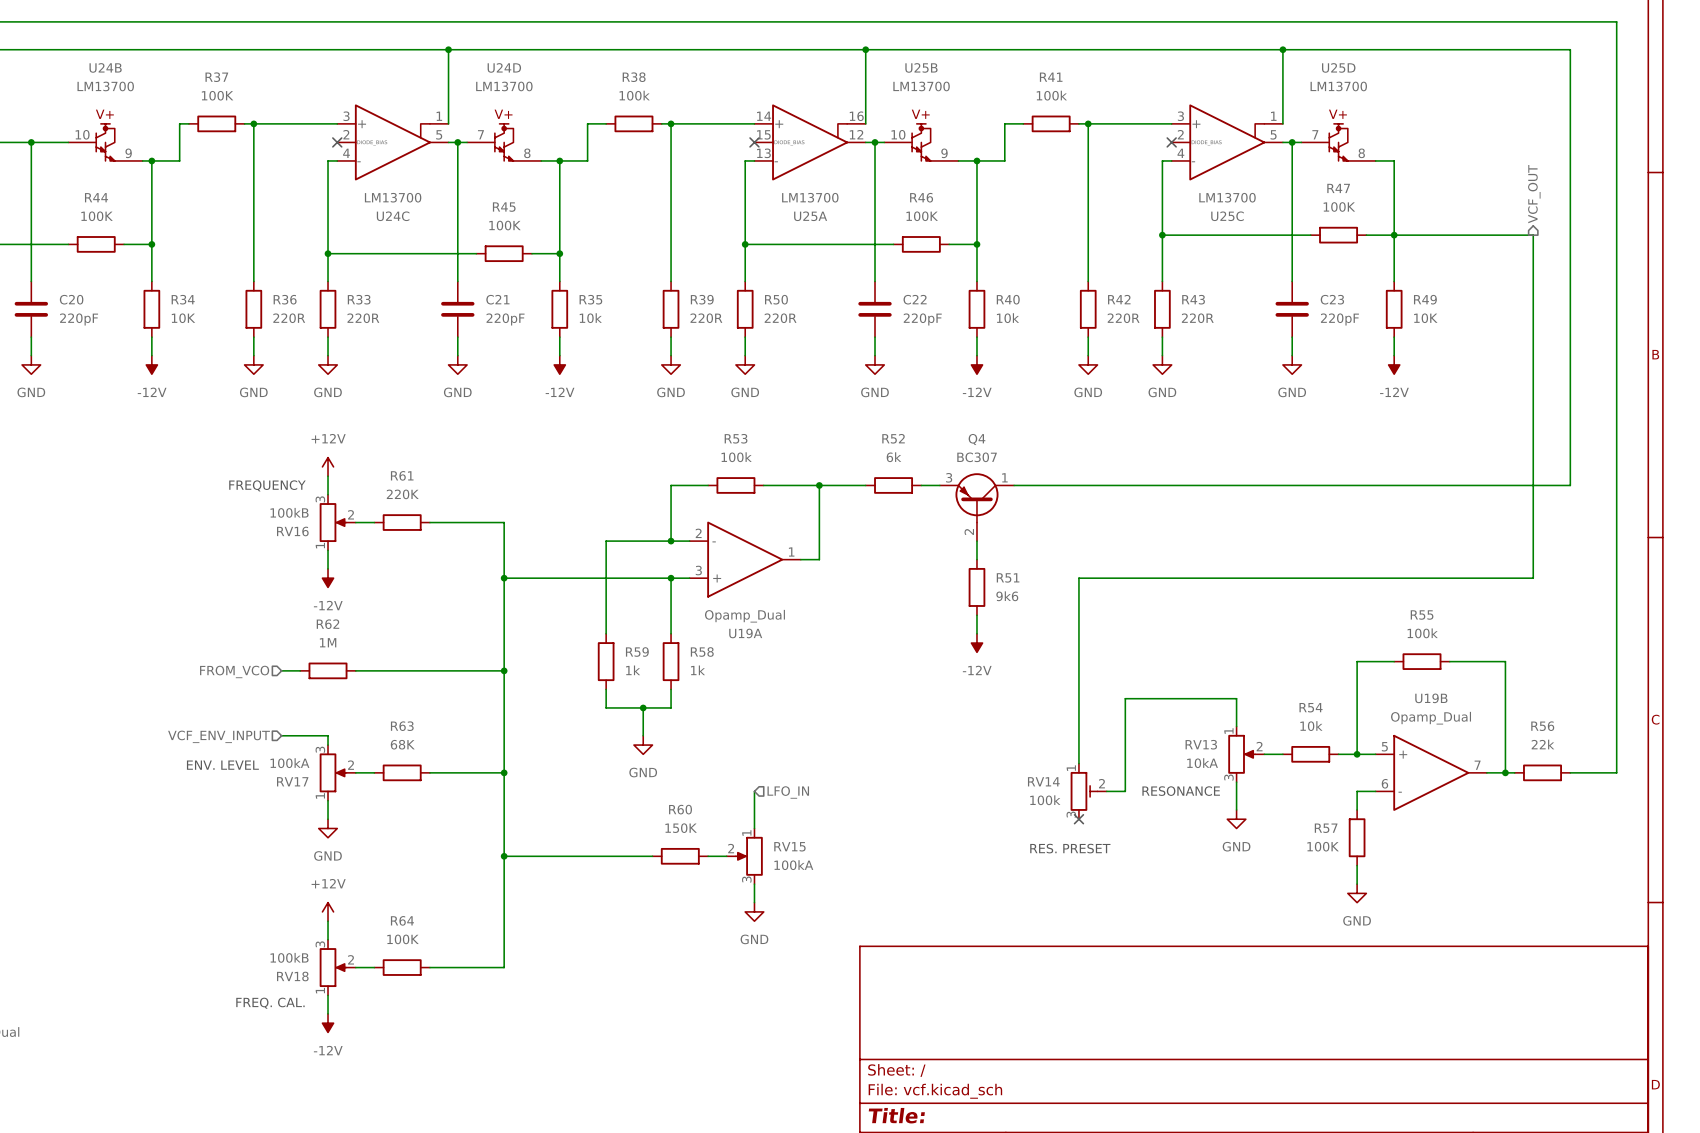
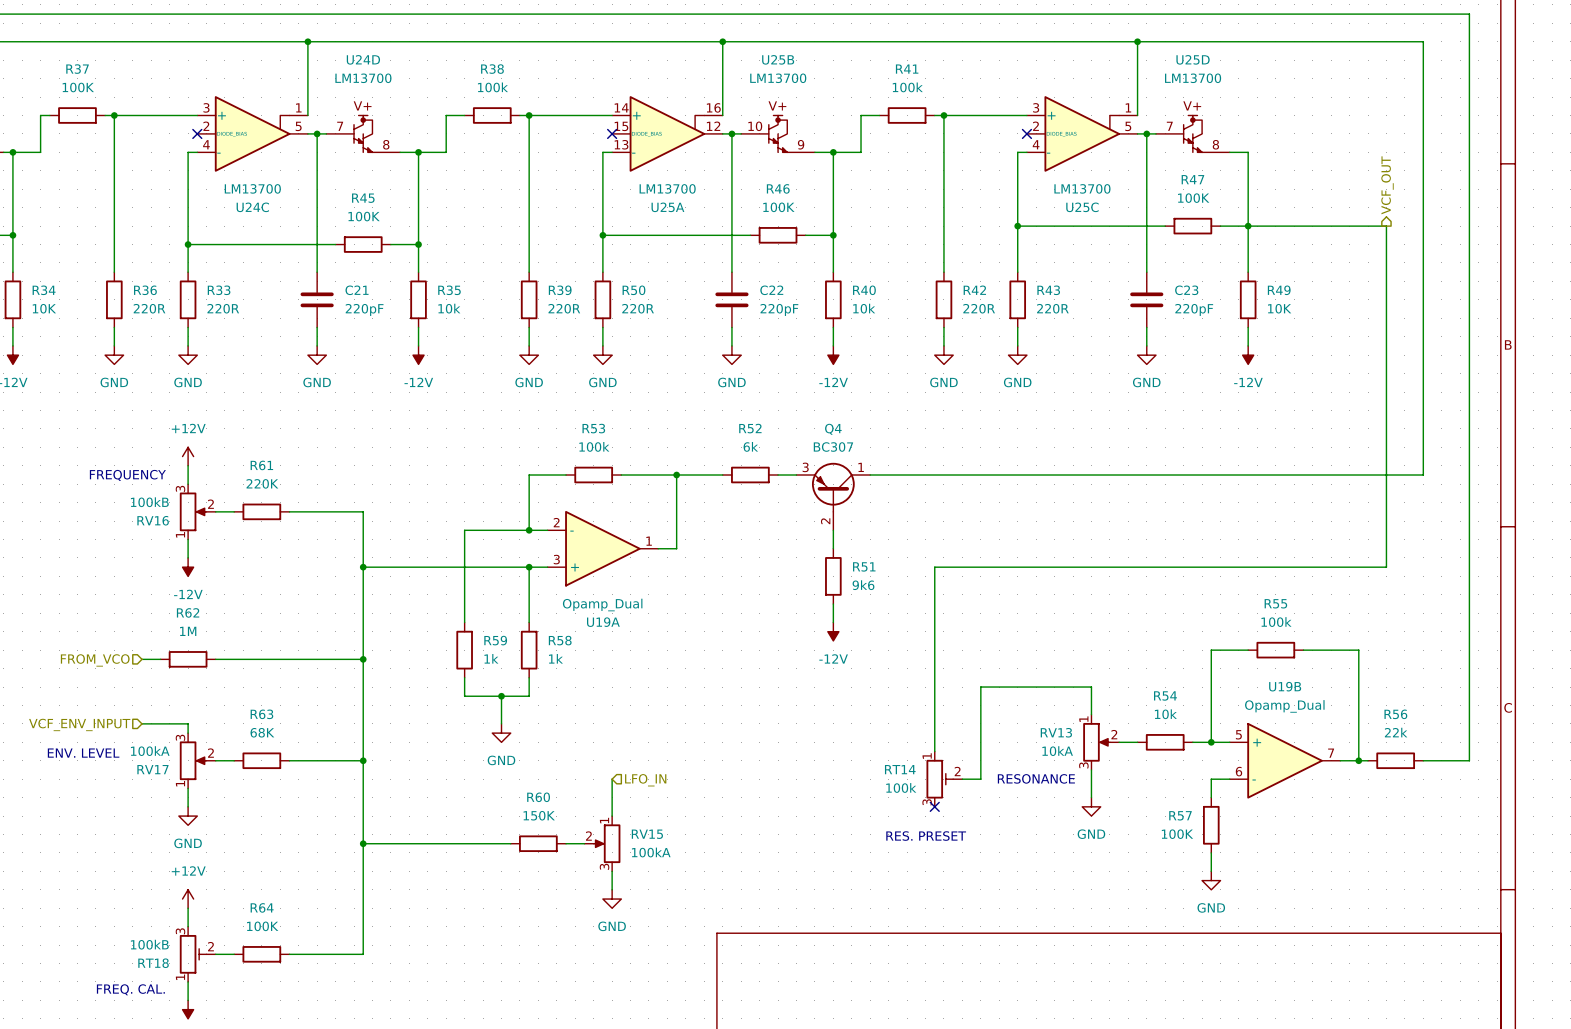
RV14 name: RV14 (1043, 781) -> RT14 (900, 769)
RV18: 100kB (337, 967) -> none
RT18: none -> 100kB (197, 954)

